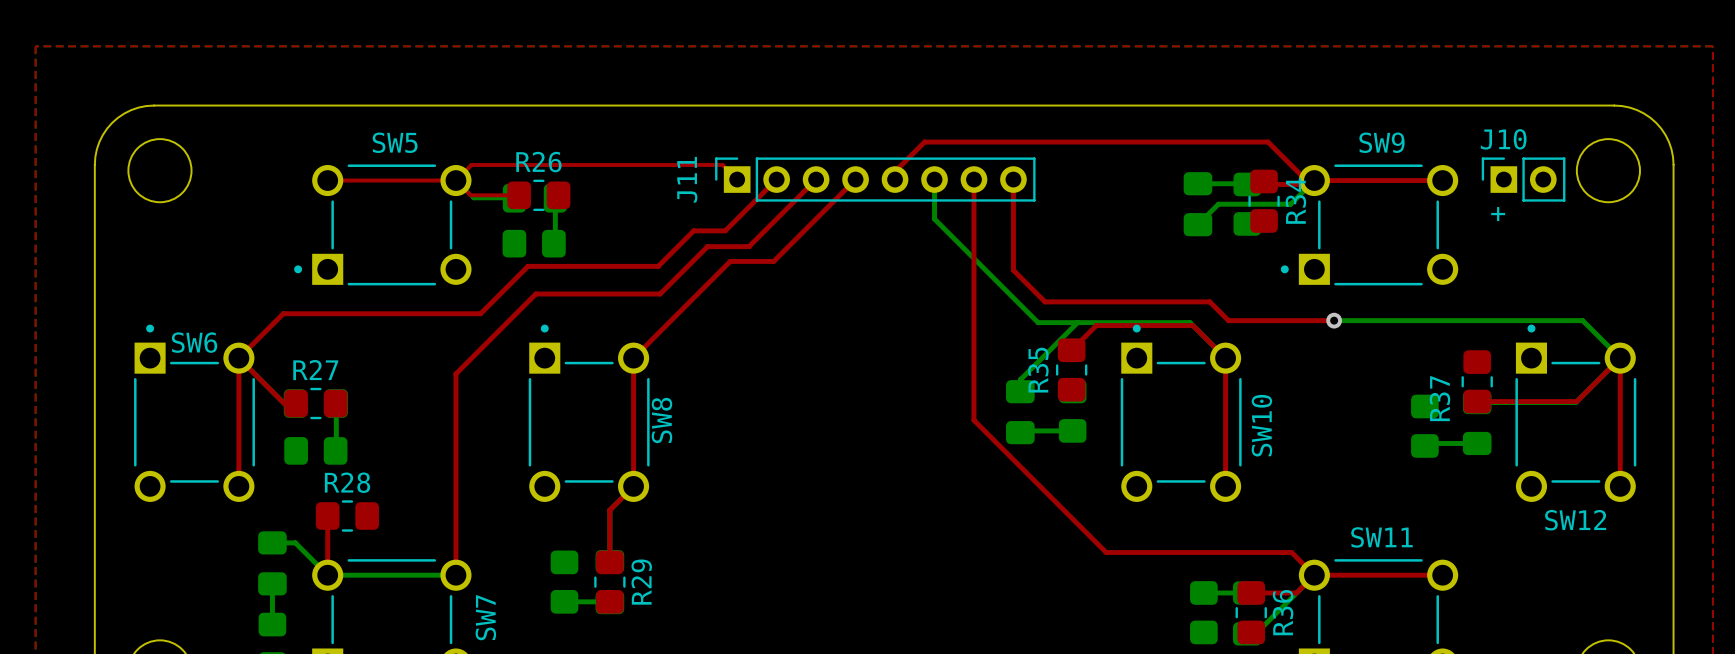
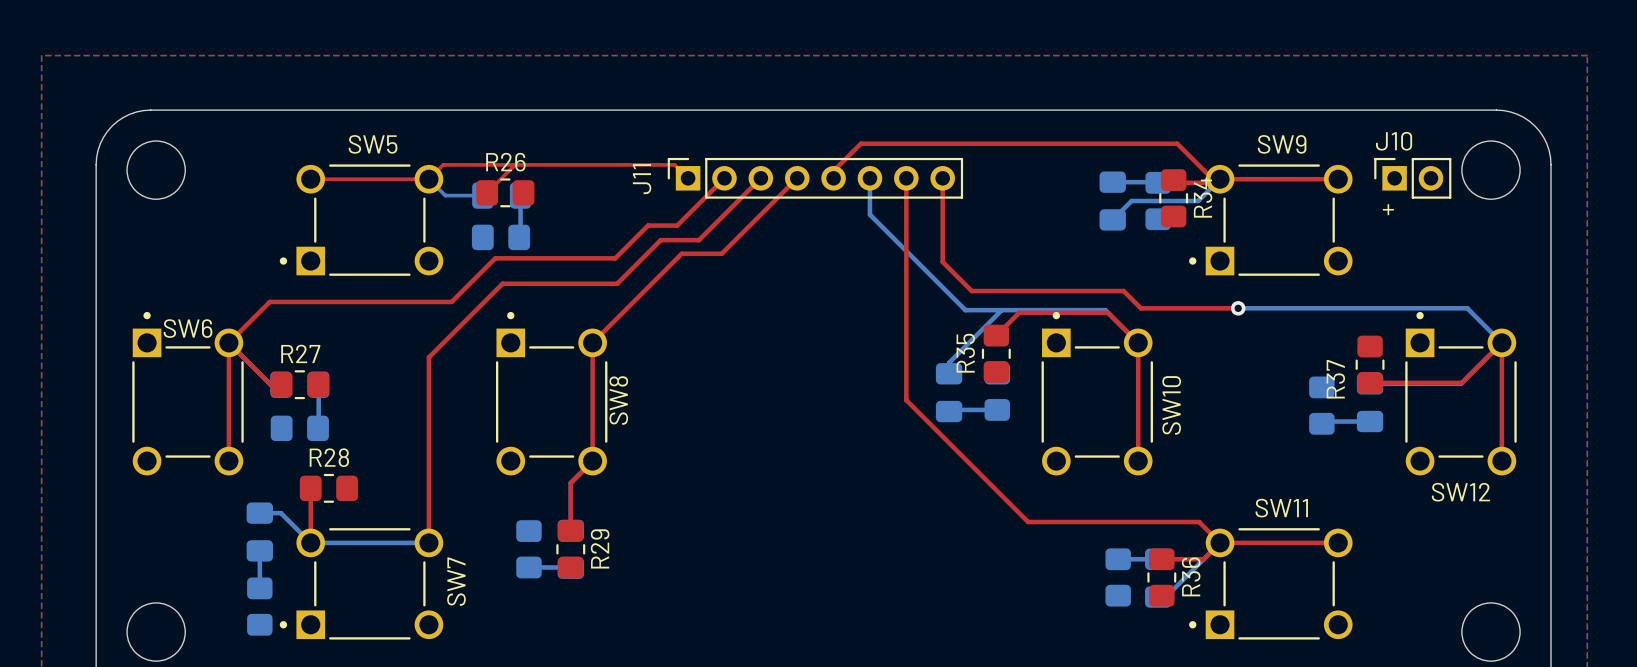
top track: (461, 186) (470, 195) (519, 195) -> (515, 164) (487, 192)

